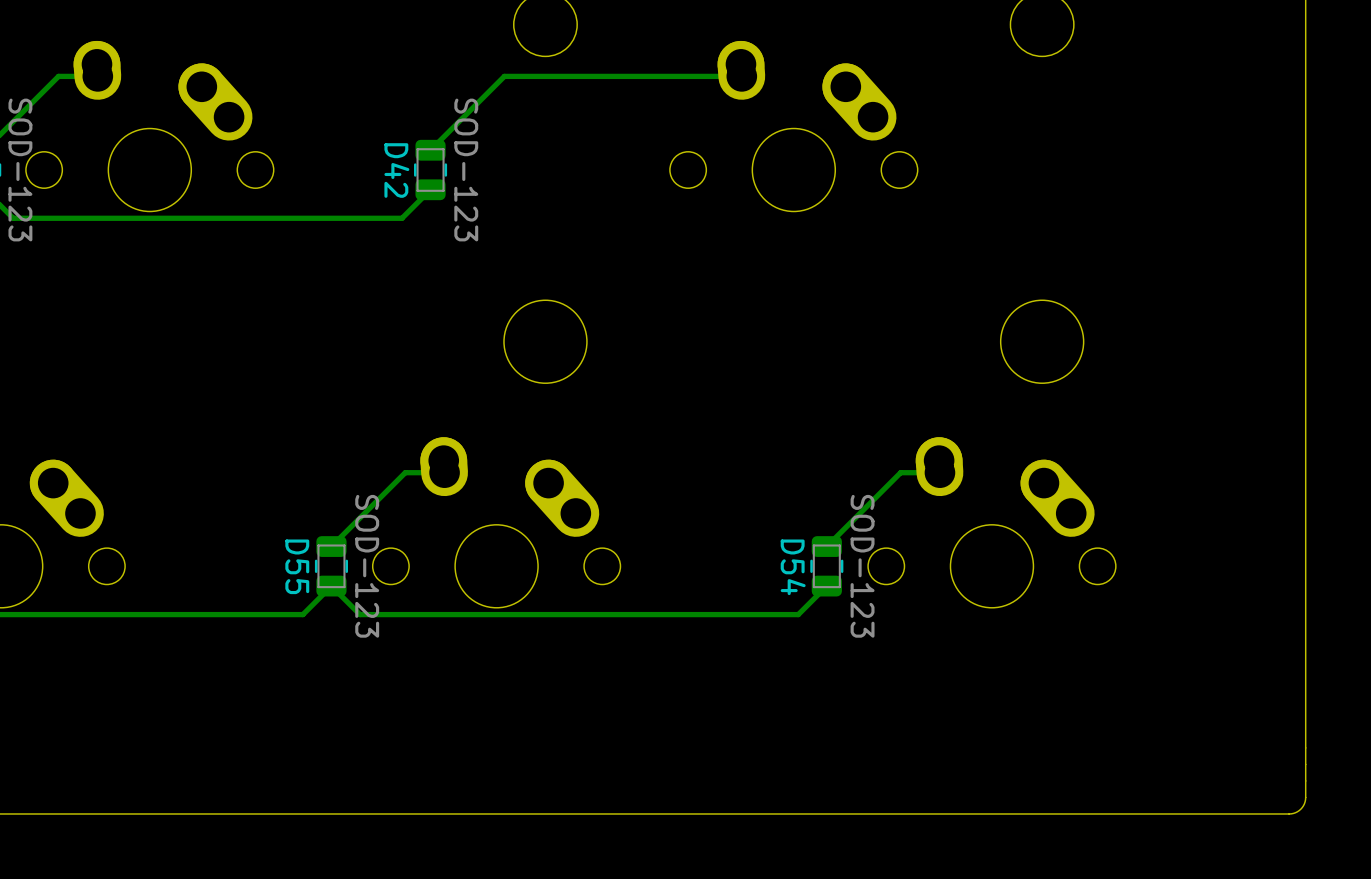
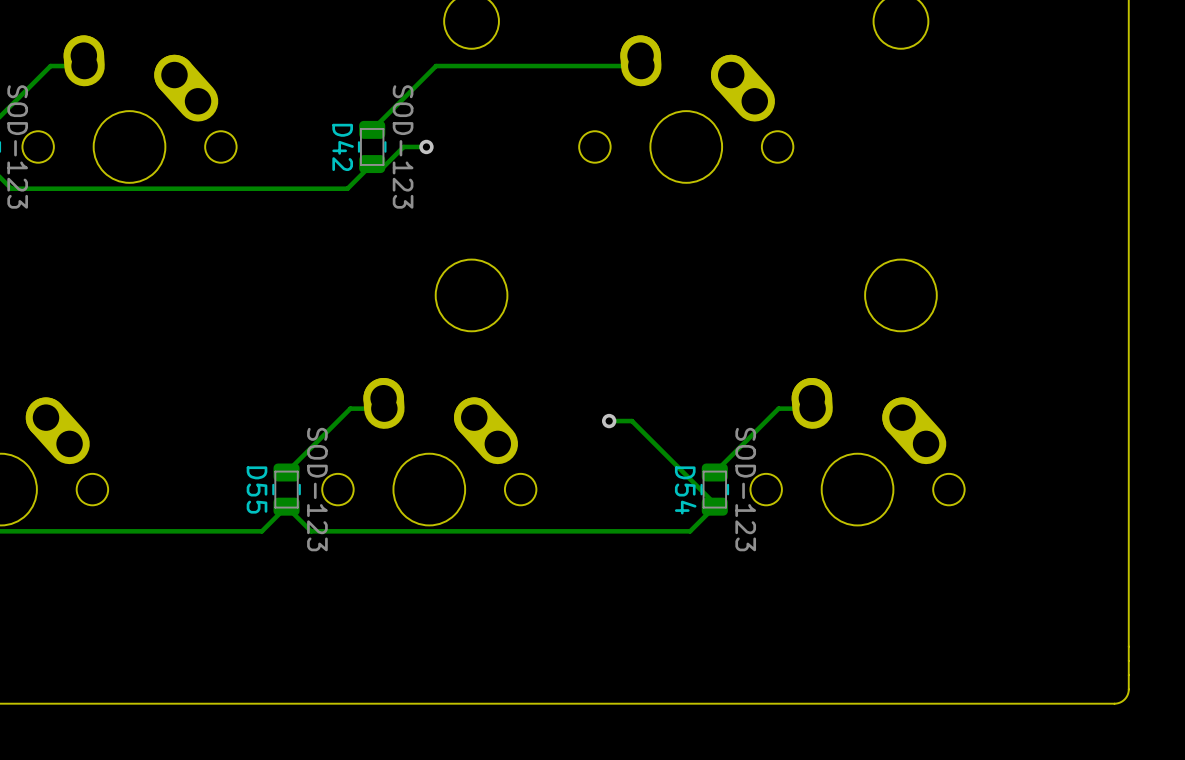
track: none -> (426, 146) (403, 146) (380, 169)
via: none -> (426, 146)
track: none -> (609, 421) (632, 421) (723, 512)
via: none -> (609, 421)

